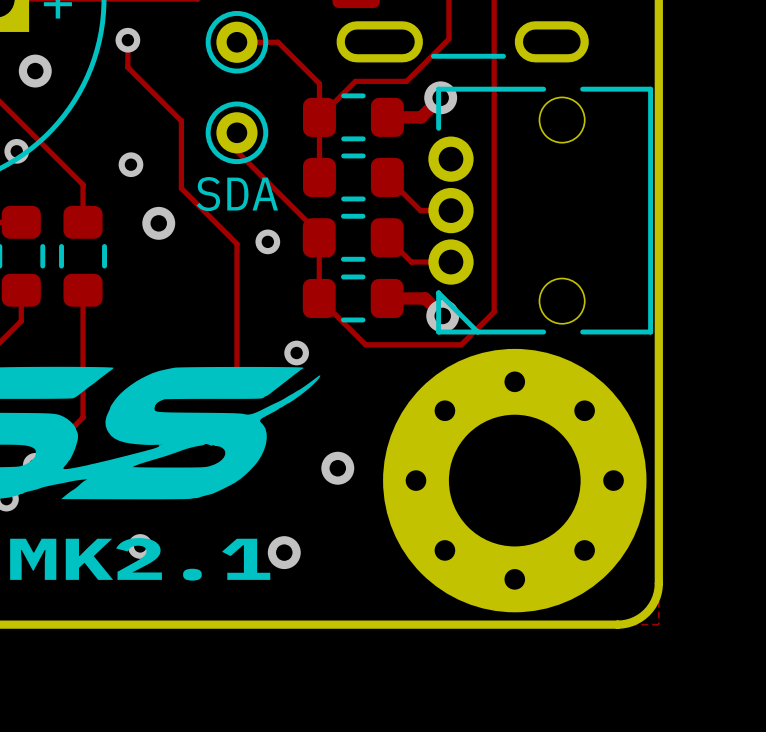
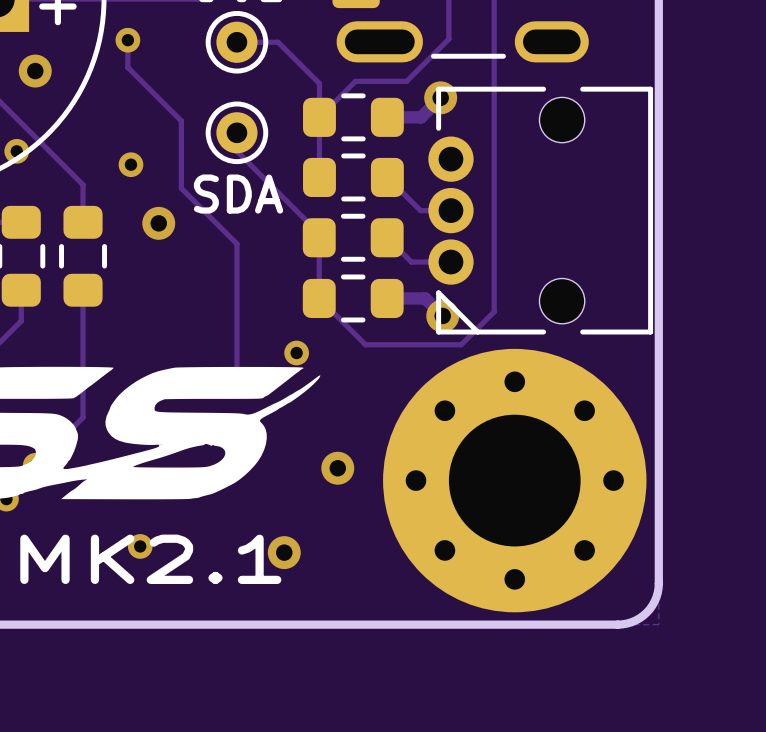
via: (267, 241) -> none

